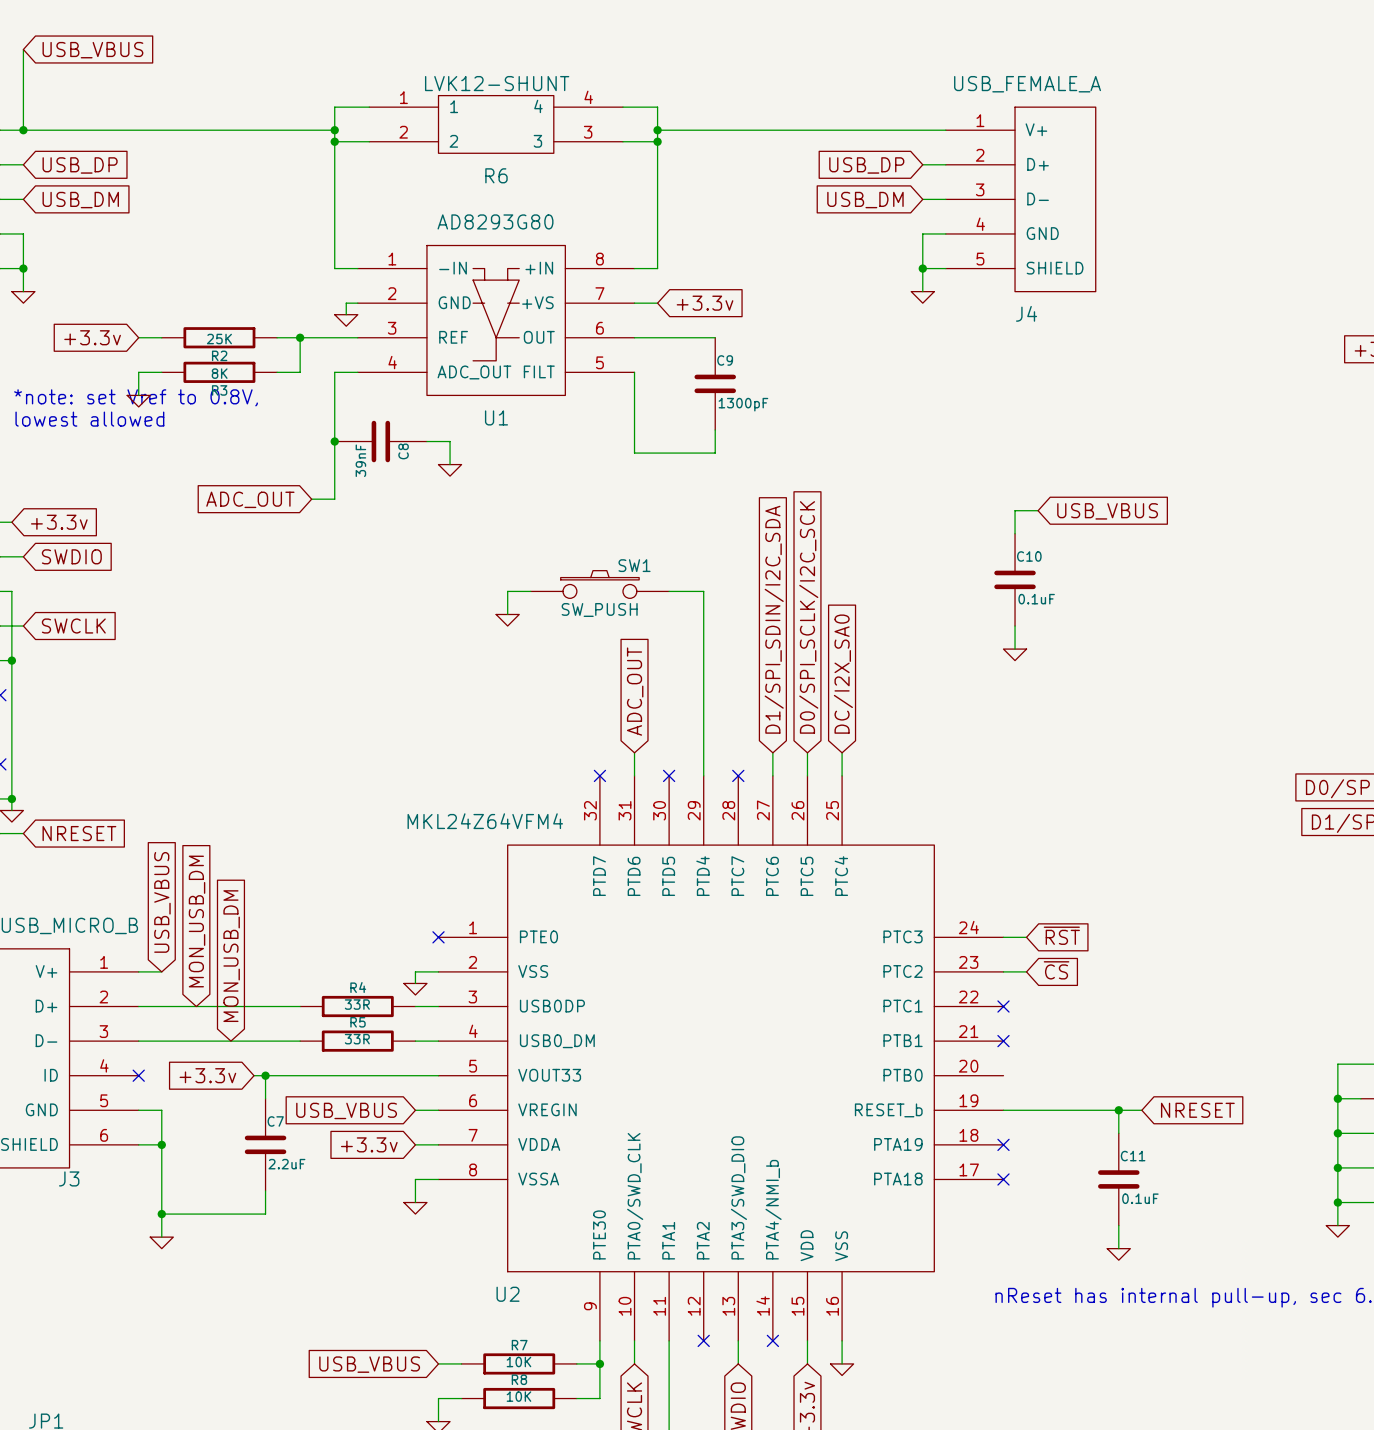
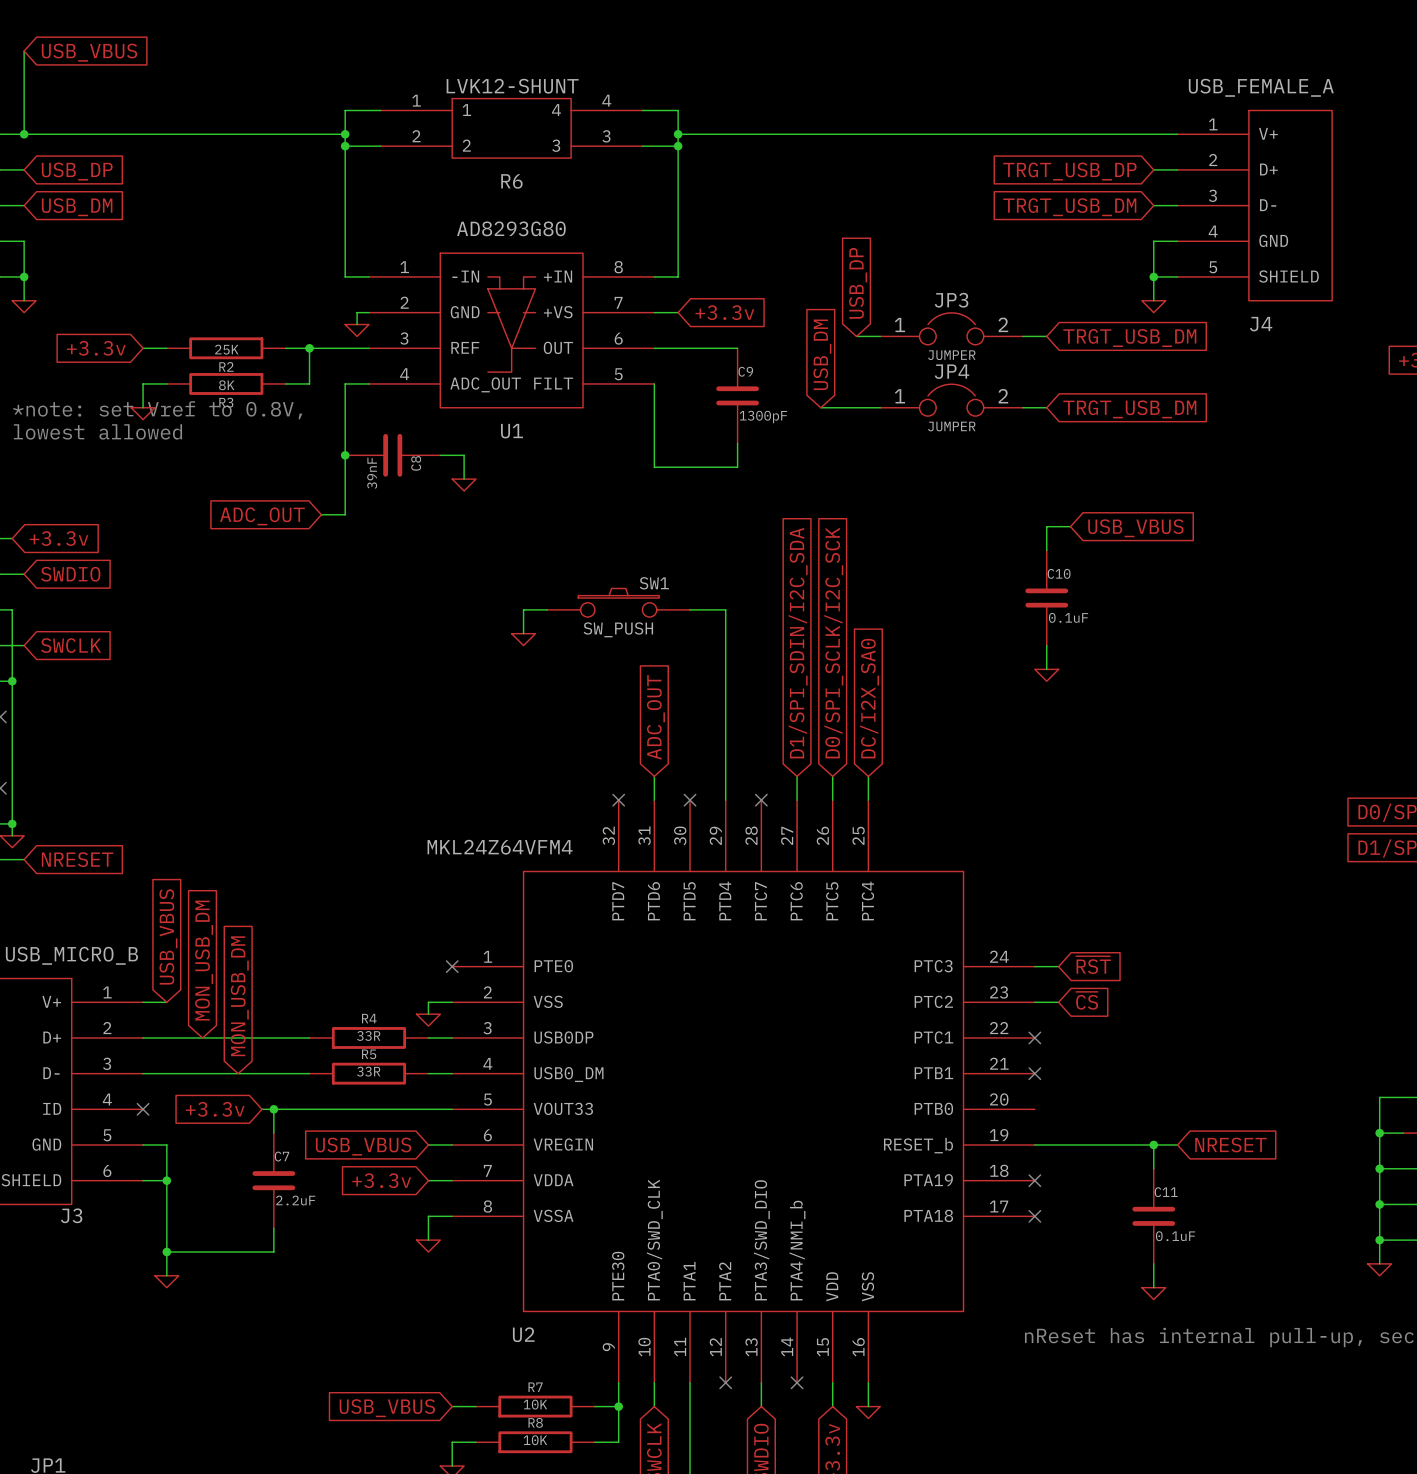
wire: none -> (975, 134) (1177, 134)
wire: (922, 164) (945, 164) -> (1153, 169) (1177, 169)
global label rotation: 0° (866, 165) -> 90° clockwise (858, 283)
global label: none -> TRGT_USB_DP (1069, 171)
wire: (922, 199) (945, 199) -> (1153, 205) (1177, 205)
J4 position: (1020, 199) -> (1254, 205)
global label: USB_DM (865, 200) -> none
global label: none -> TRGT_USB_DM (1069, 207)
wire: (945, 233) (922, 233) (922, 291) -> (1177, 241) (1153, 241) (1153, 300)
wire: (922, 268) (945, 268) -> (1153, 276) (1177, 276)
junction: (922, 268) -> none
junction: none -> (1153, 276)
power symbol position: (922, 297) -> (1153, 306)
JP3: none -> JUMPER (951, 328)
wire: none -> (856, 336) (880, 336)
wire: none -> (1022, 336) (1046, 336)
global label: none -> TRGT_USB_DM (1129, 338)
global label: none -> USB_DM (822, 354)
JP4: none -> JUMPER (951, 400)
wire: none -> (820, 407) (880, 407)
wire: none -> (1022, 407) (1046, 407)
global label: none -> TRGT_USB_DM (1129, 409)

